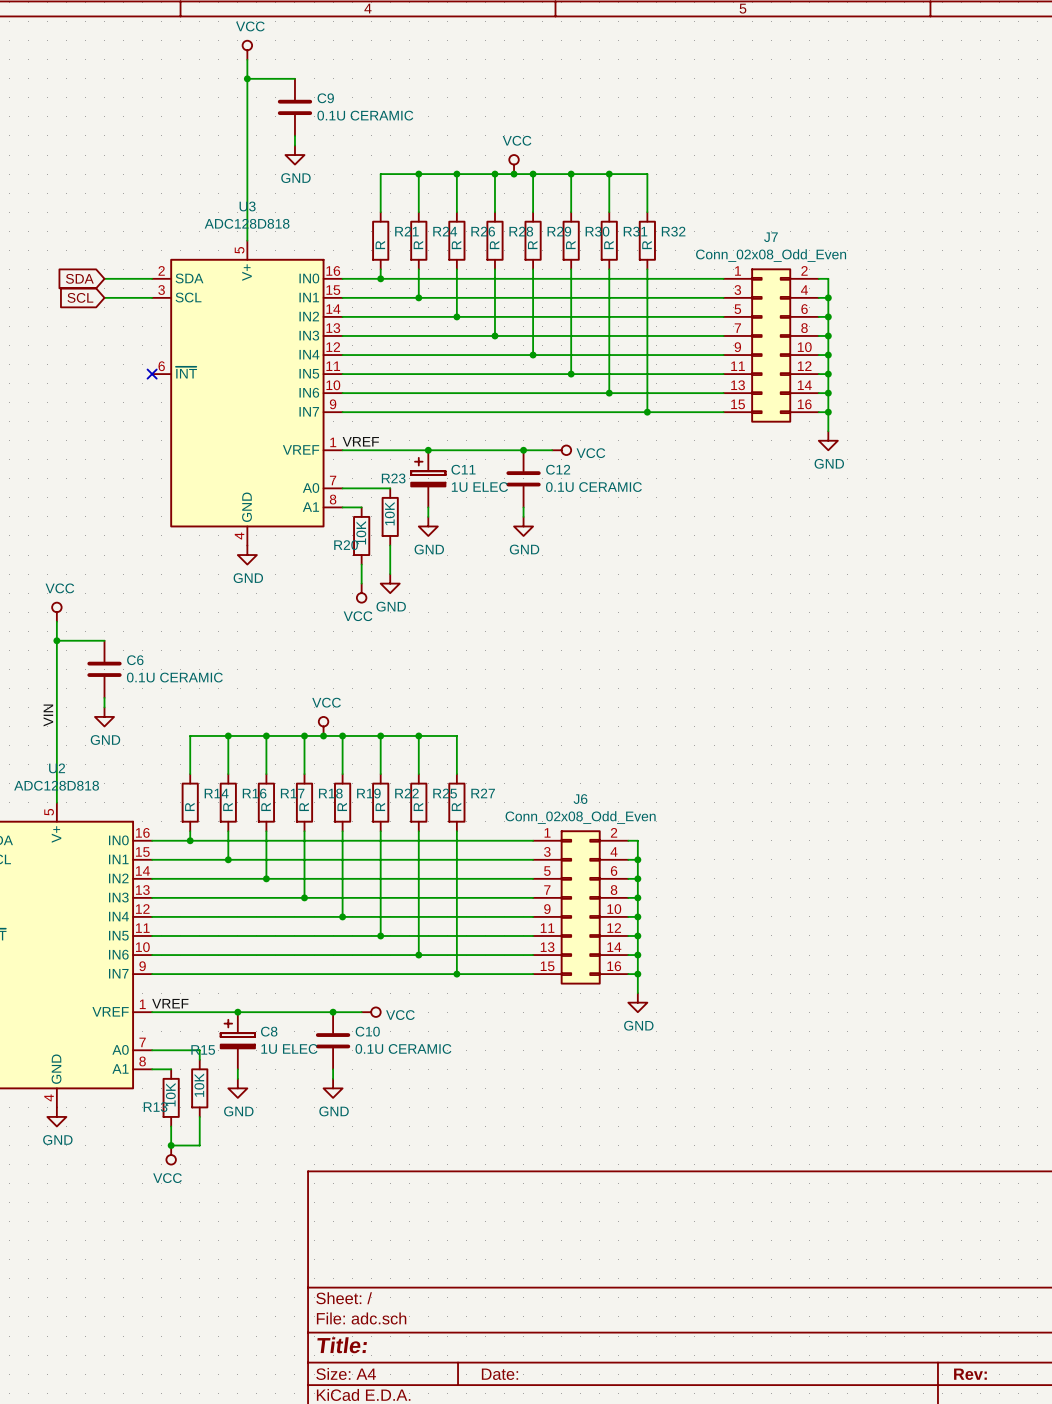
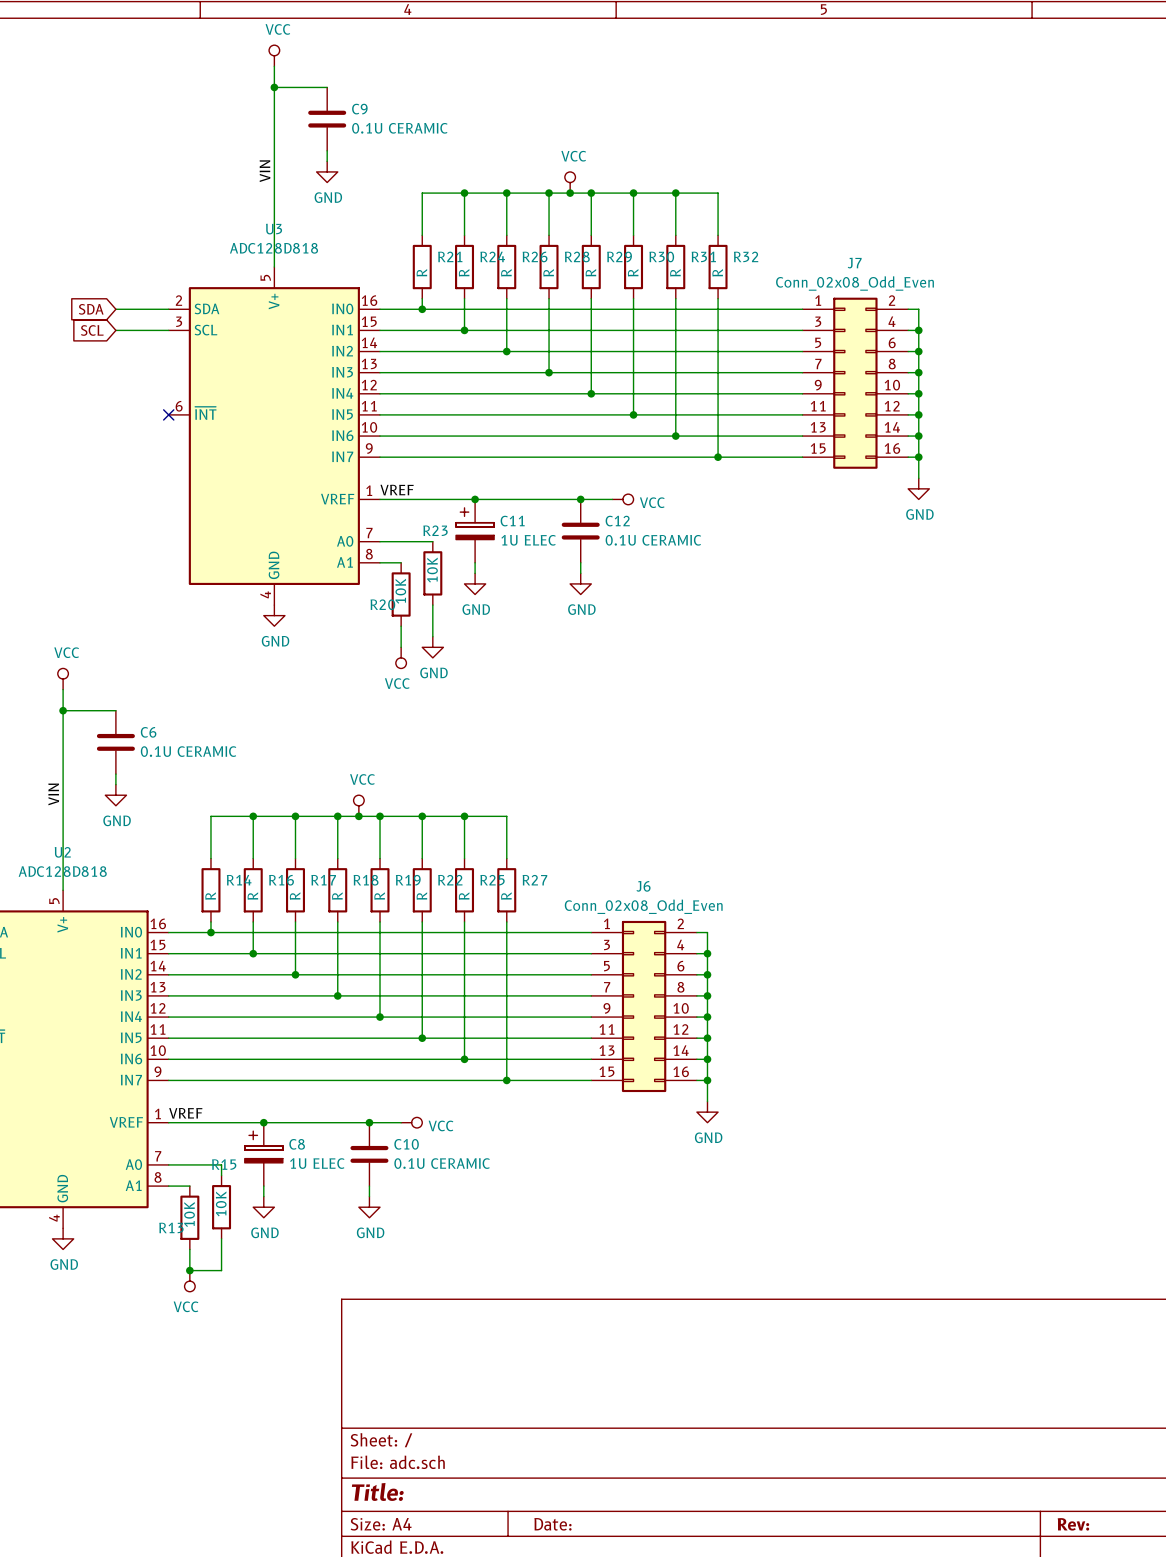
label: none -> VIN (265, 171)

